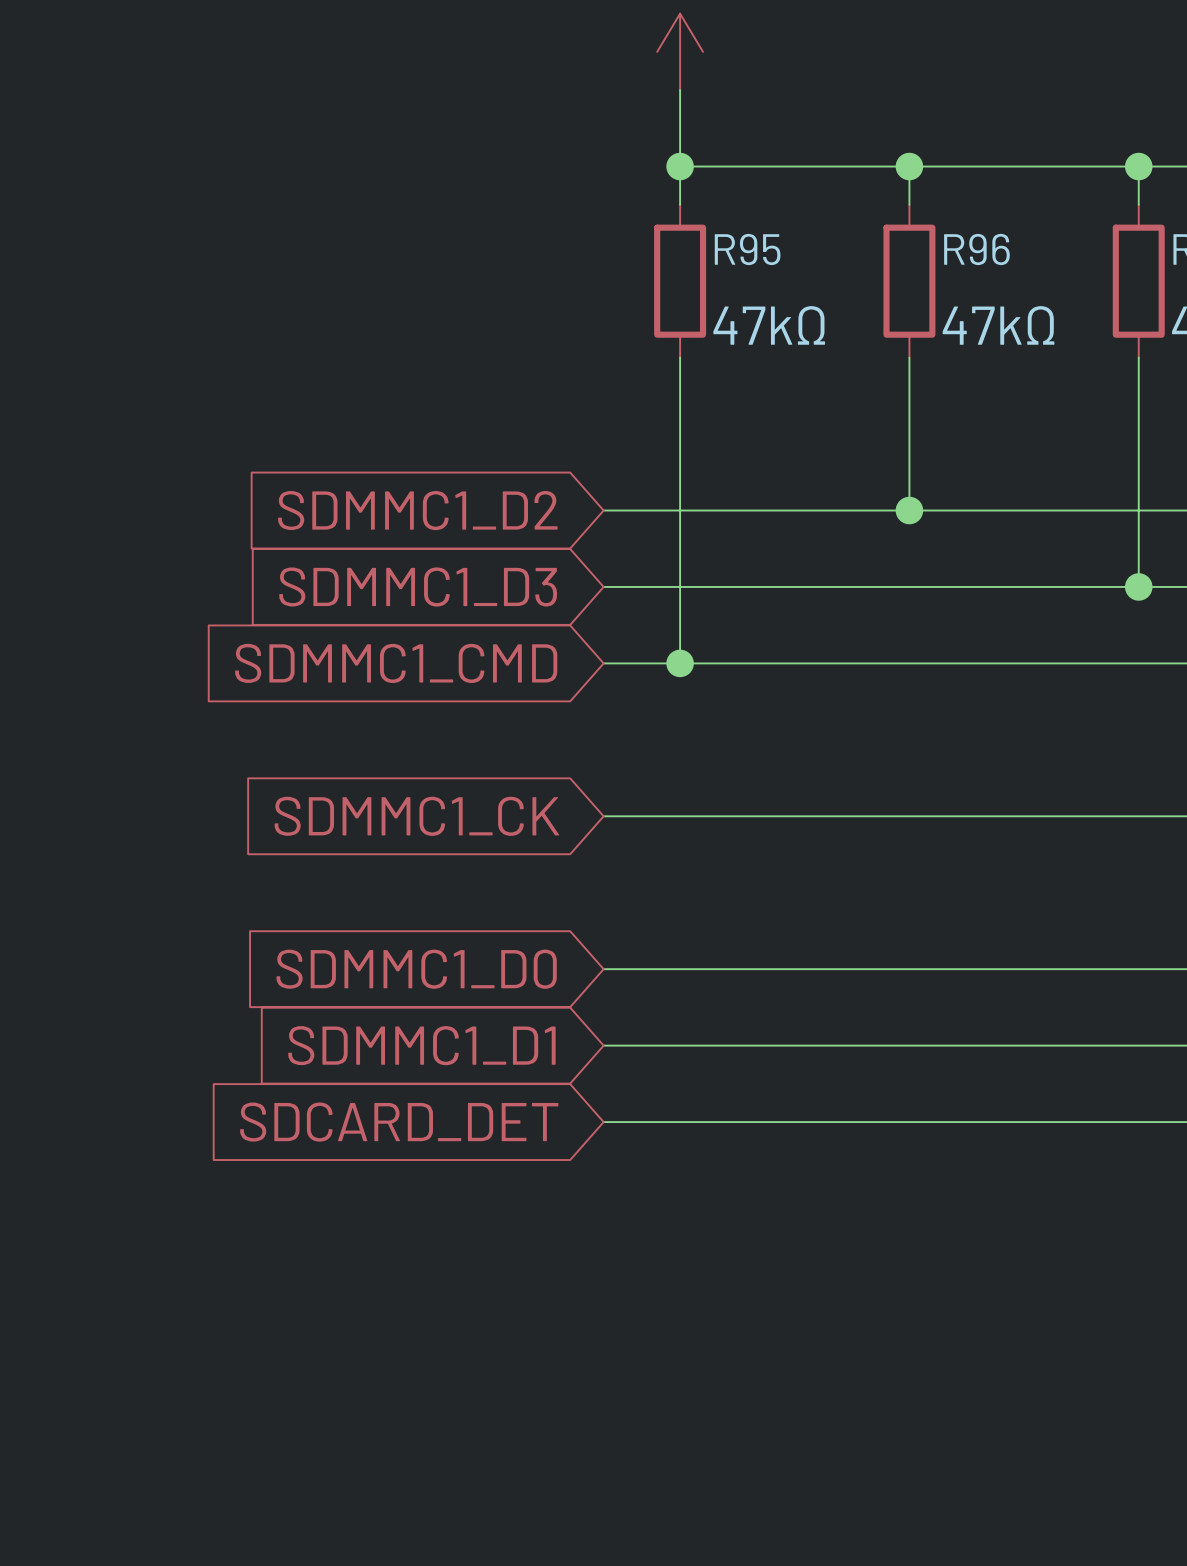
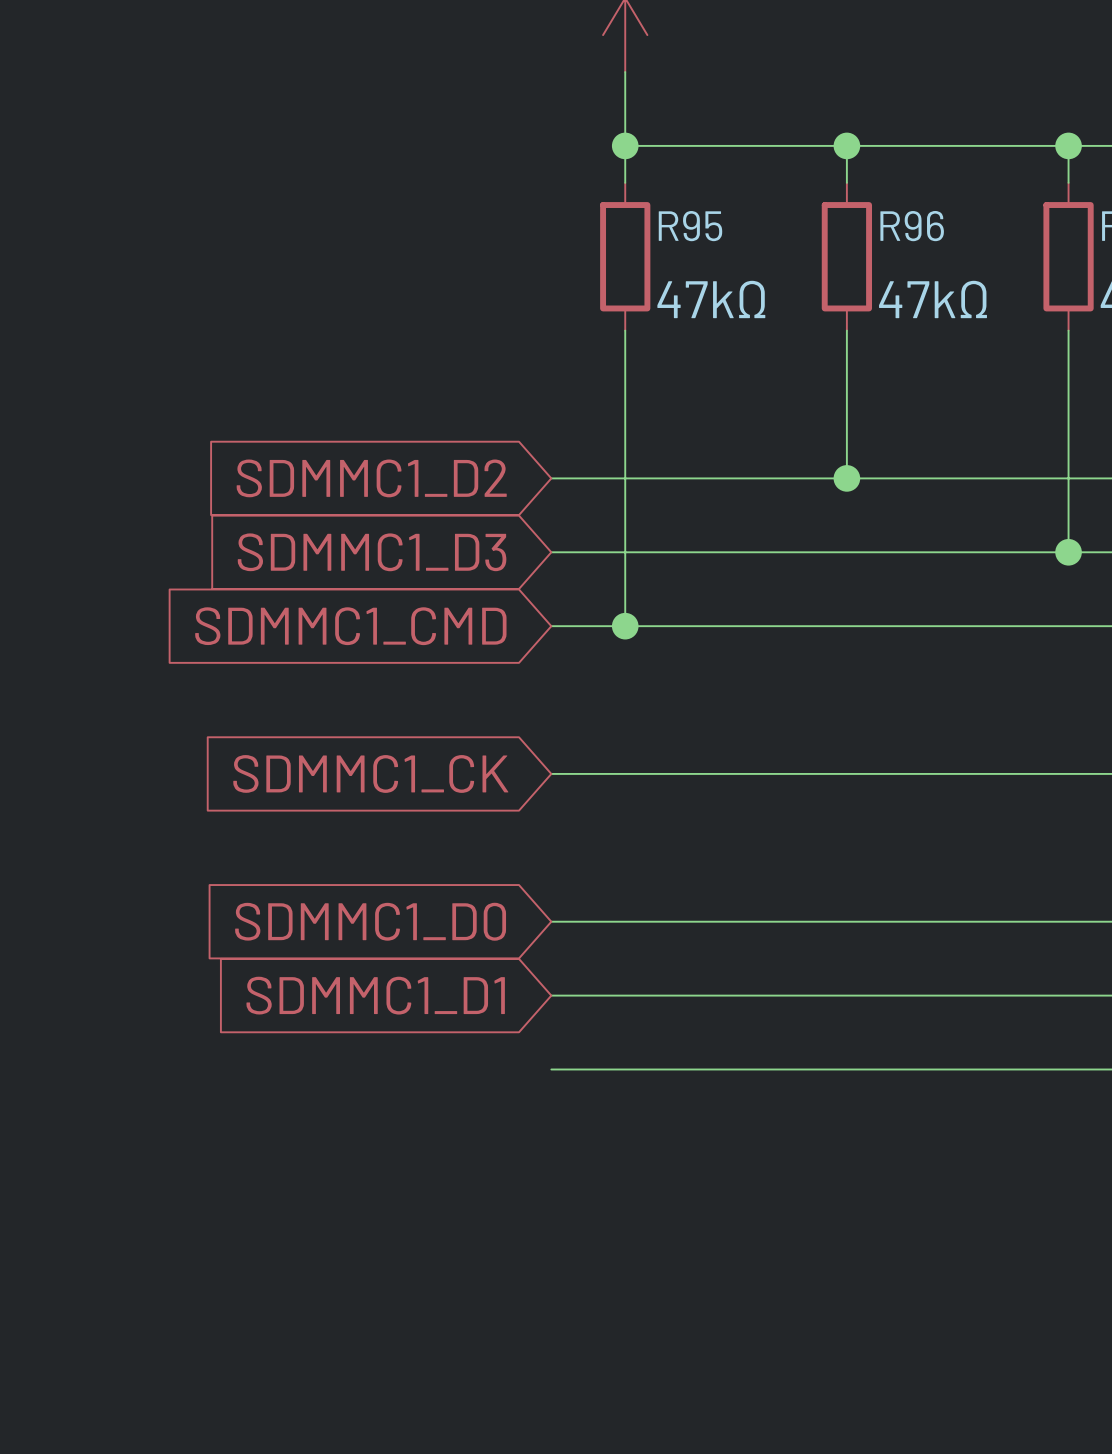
global label: SDCARD_DET (399, 1122) -> none

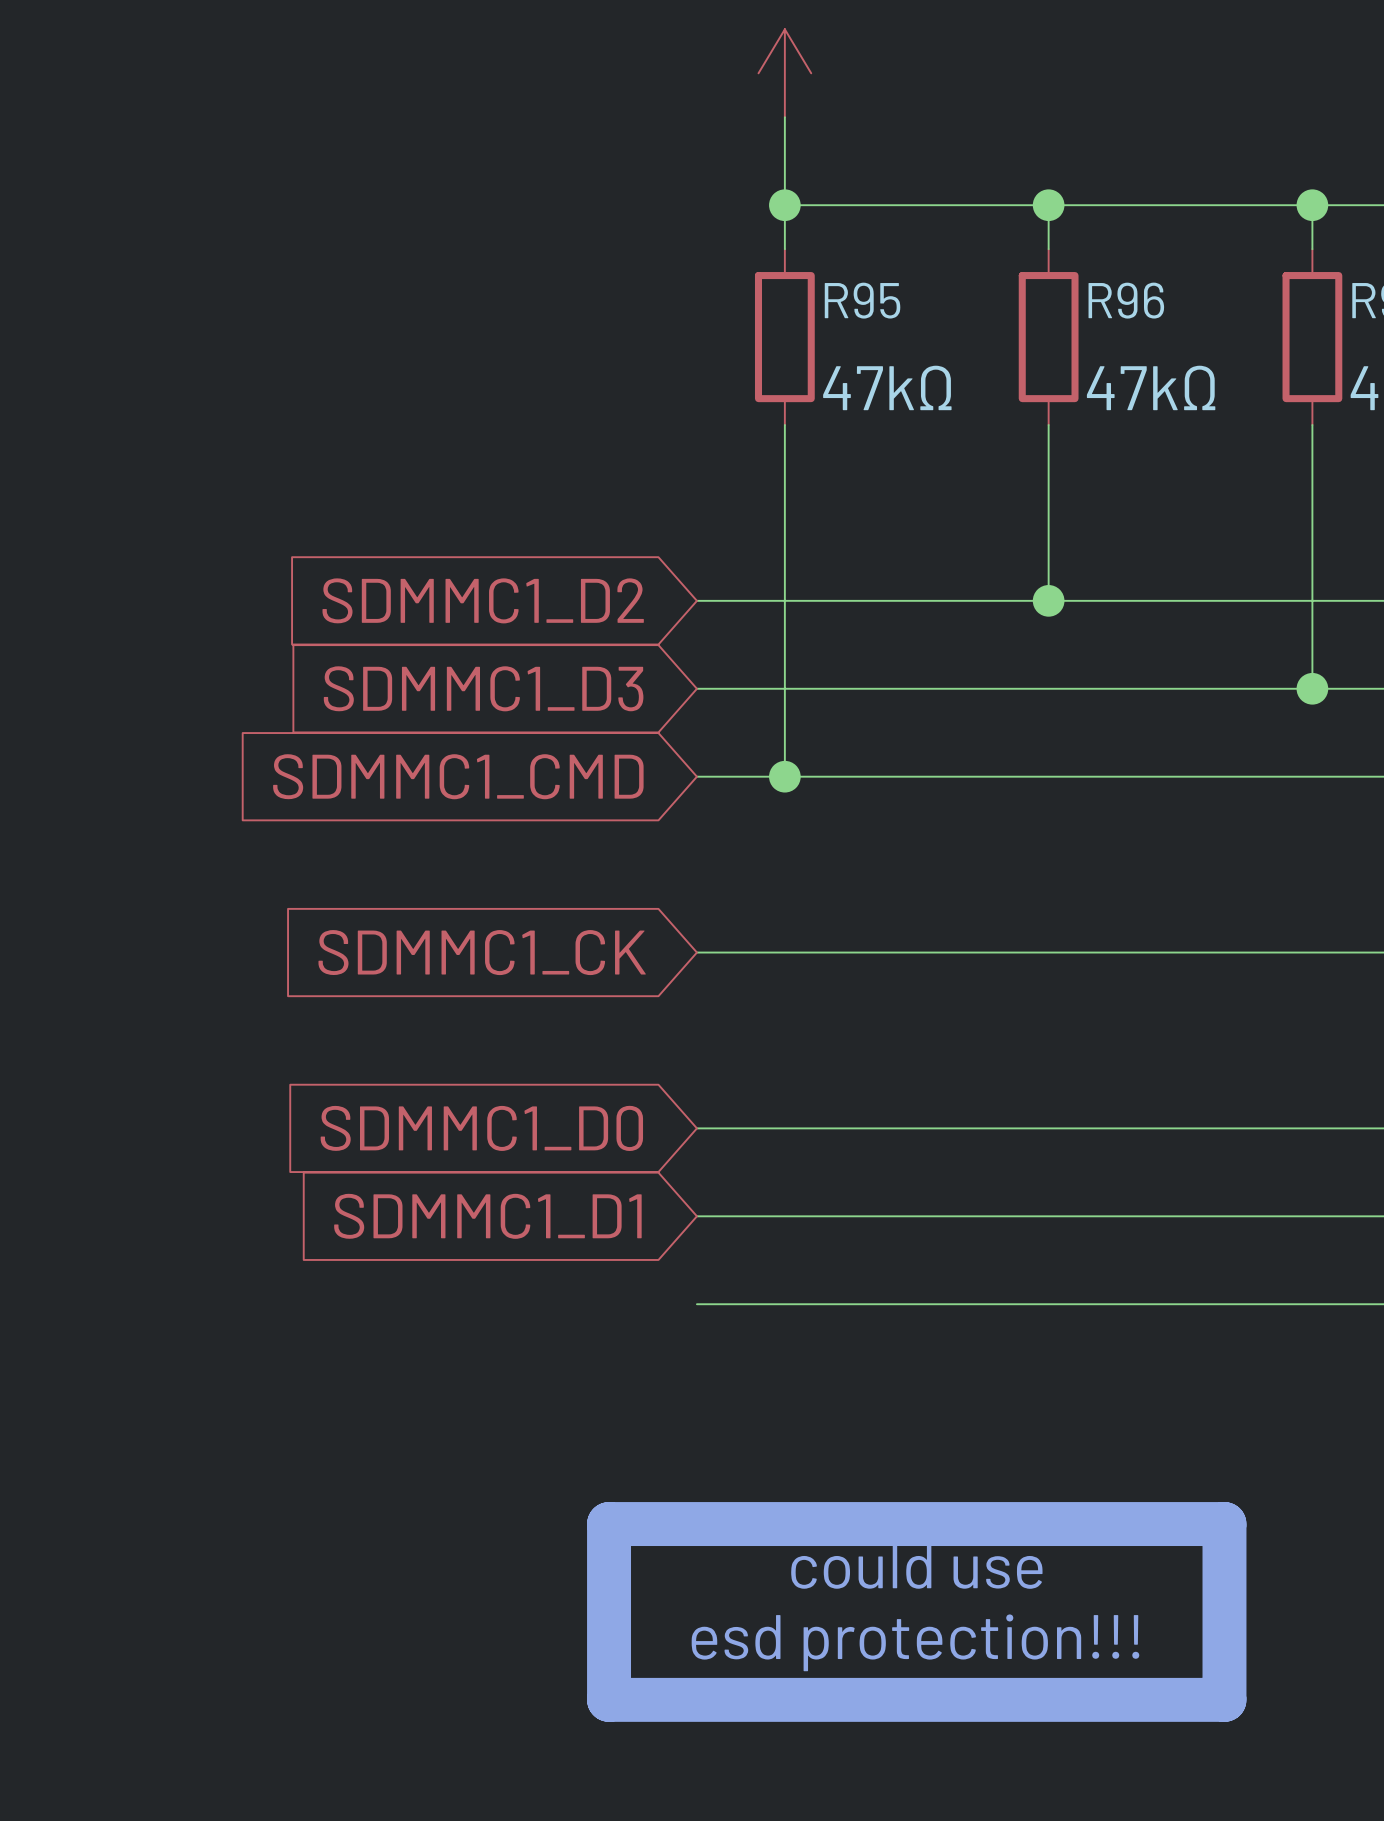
line: none -> (609, 1524) (1224, 1524) (1224, 1699) (609, 1699) (609, 1524)
text: none -> could use (916, 1566)
text: none -> esd protection!!! (915, 1642)

